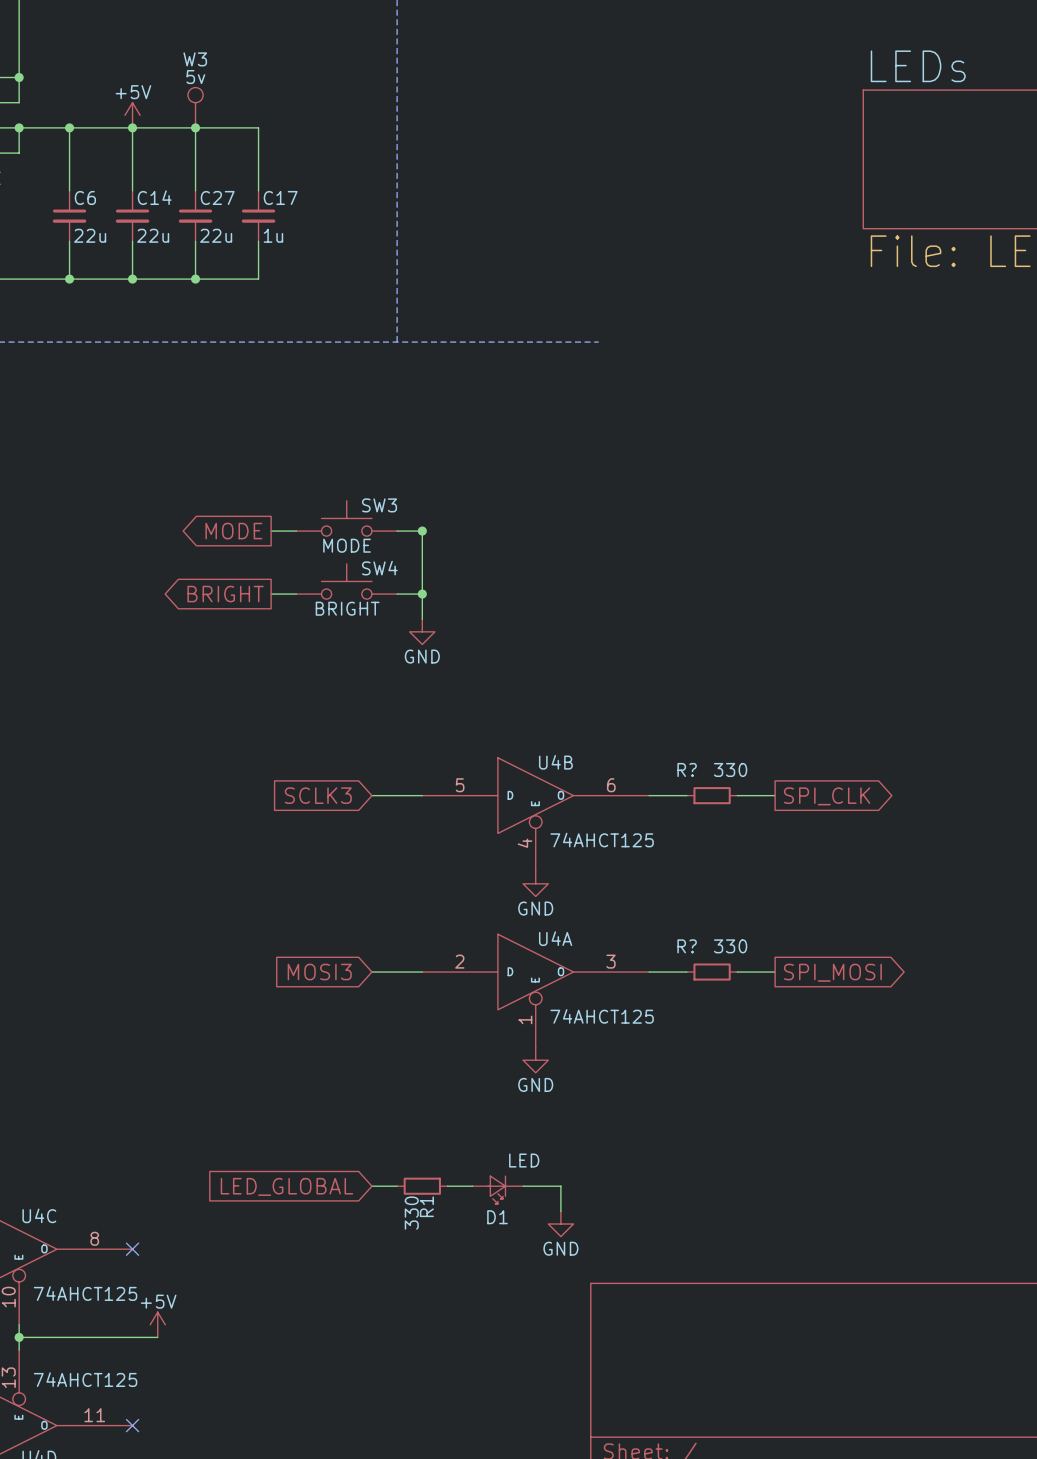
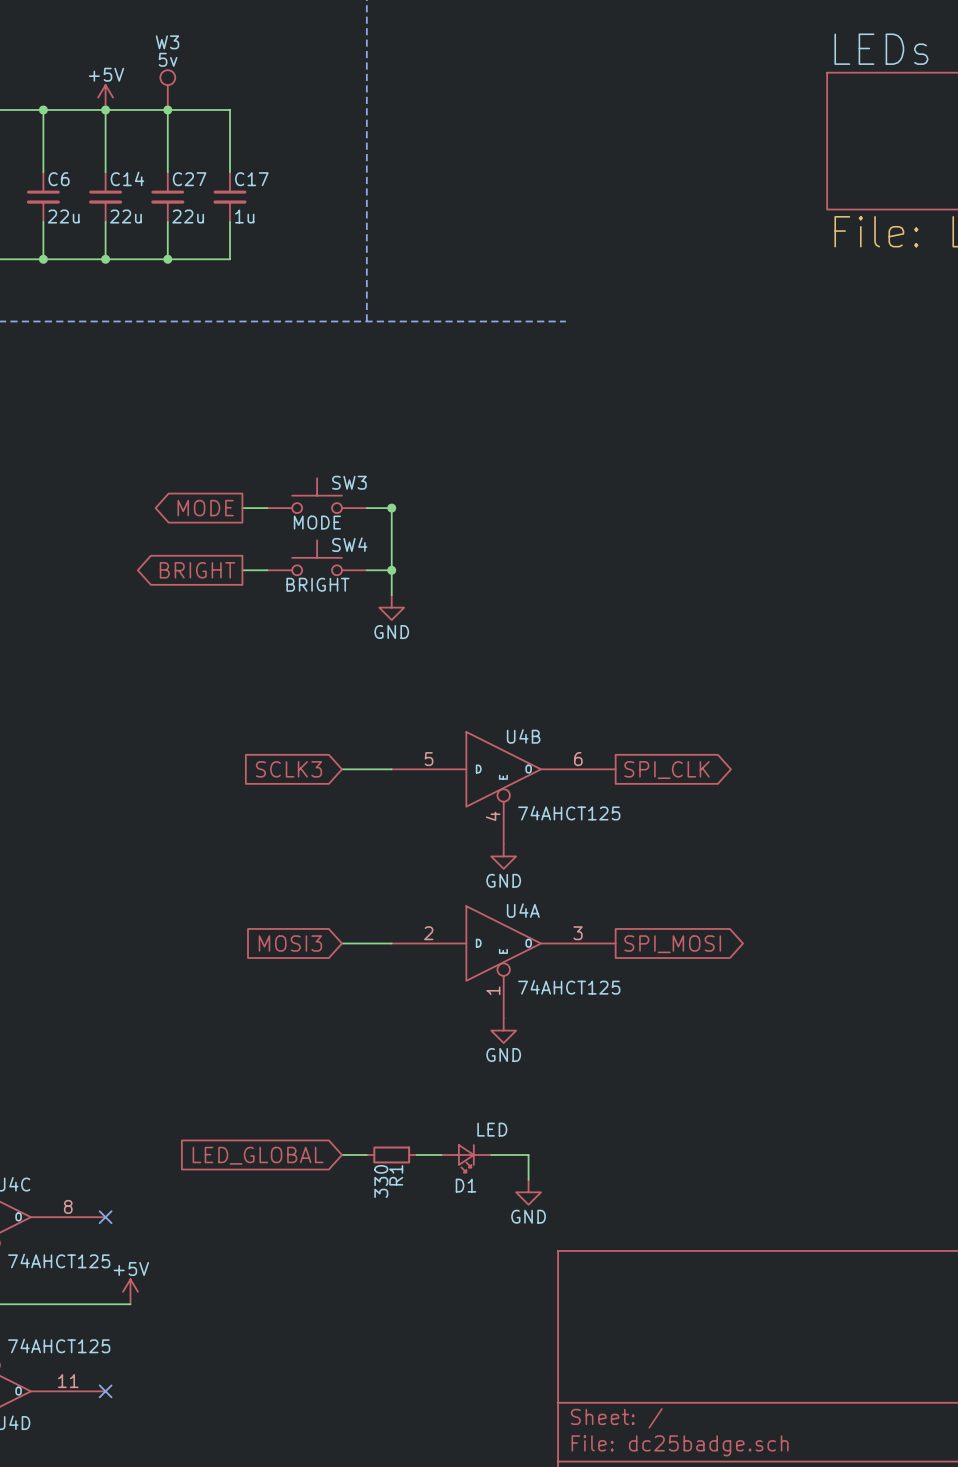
wire: (649, 795) (686, 795) -> none
R?: 330 (712, 795) -> none
wire: (737, 795) (775, 795) -> none
global label position: SPI_CLK (827, 796) -> SPI_CLK (667, 770)
wire: (649, 972) (686, 972) -> none
R?: 330 (712, 972) -> none
wire: (737, 972) (775, 972) -> none
global label position: SPI_MOSI (832, 972) -> SPI_MOSI (672, 944)

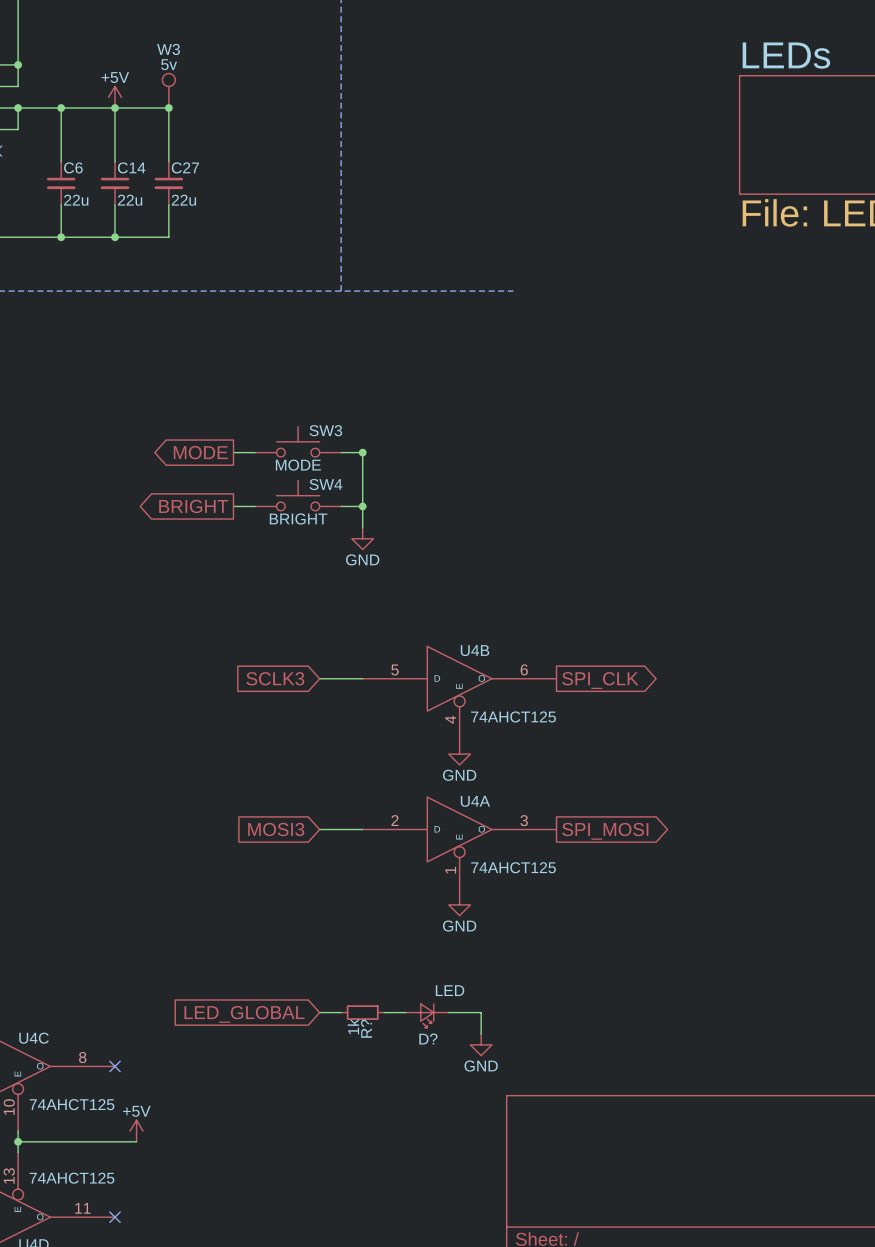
wire: (167, 110) (230, 110) (230, 172) -> none
C17: 1u (230, 197) -> none
wire: (230, 221) (230, 259) (167, 259) -> none
junction: (167, 259) -> none
R1 name: R1 (396, 1175) -> R? (366, 1028)
R1 value: 330 (381, 1181) -> 1k (353, 1026)
D1 name: D1 (465, 1185) -> D? (428, 1039)

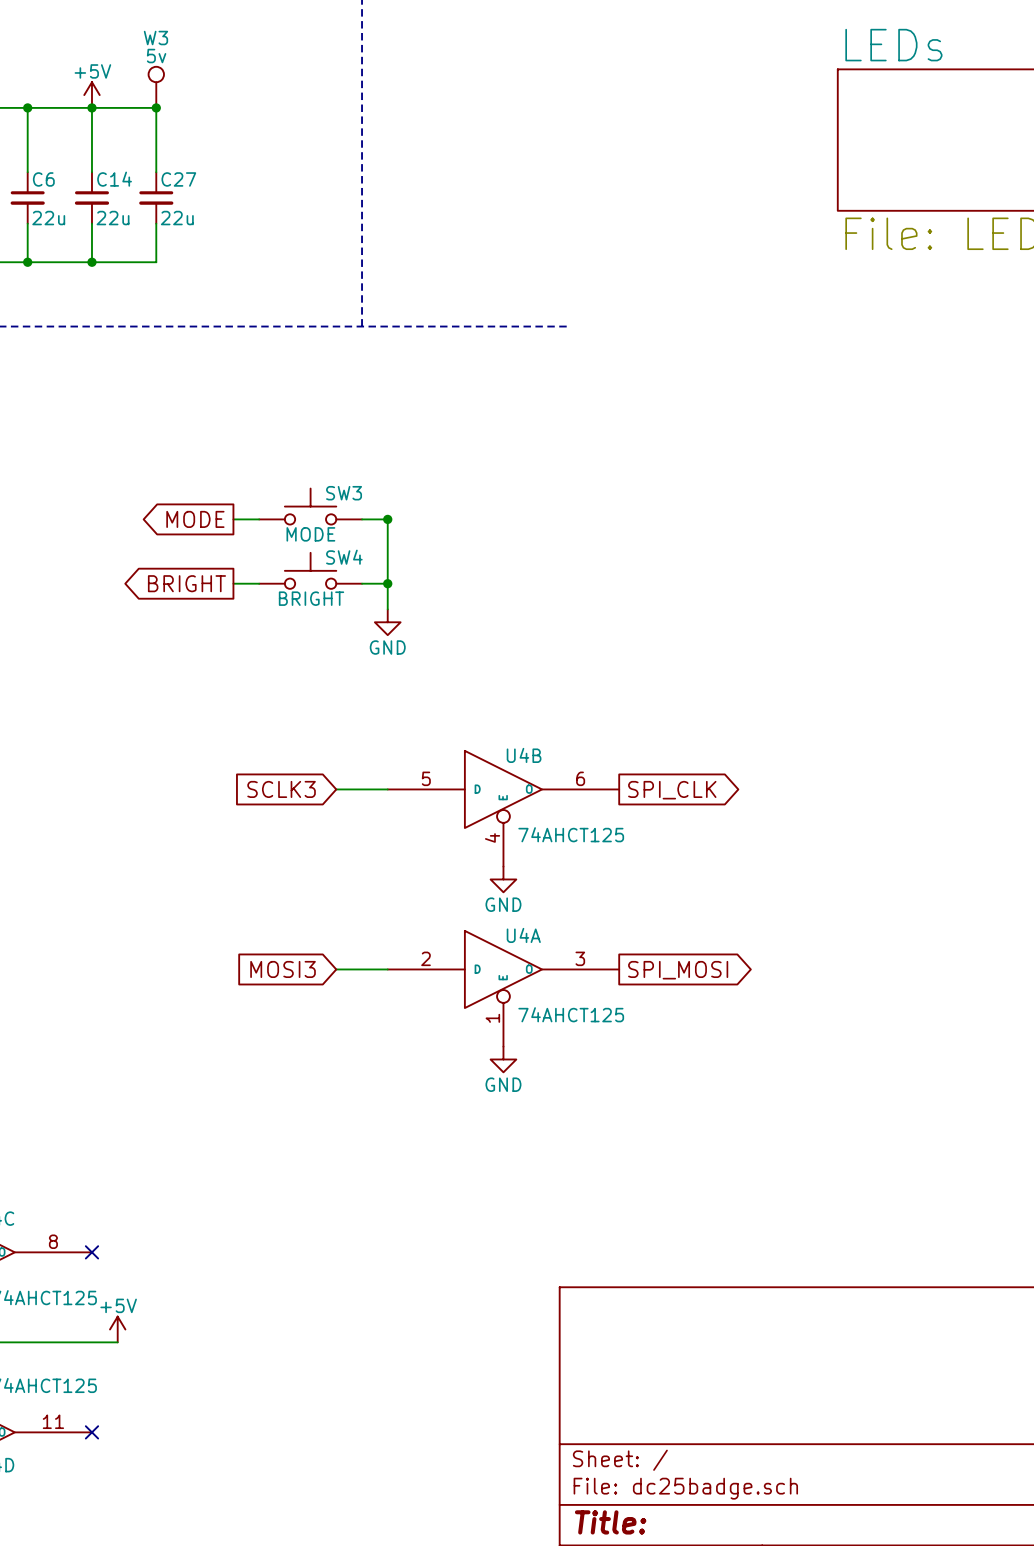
wire: (319, 1012) (341, 1012) -> none
R?: 1k (362, 1012) -> none
wire: (384, 1012) (405, 1012) -> none
wire: (448, 1012) (481, 1012) (481, 1034) -> none
global label: LED_GLOBAL (244, 1014) -> none
D?: LED (427, 1015) -> none
power symbol: GND (481, 1044) -> none

